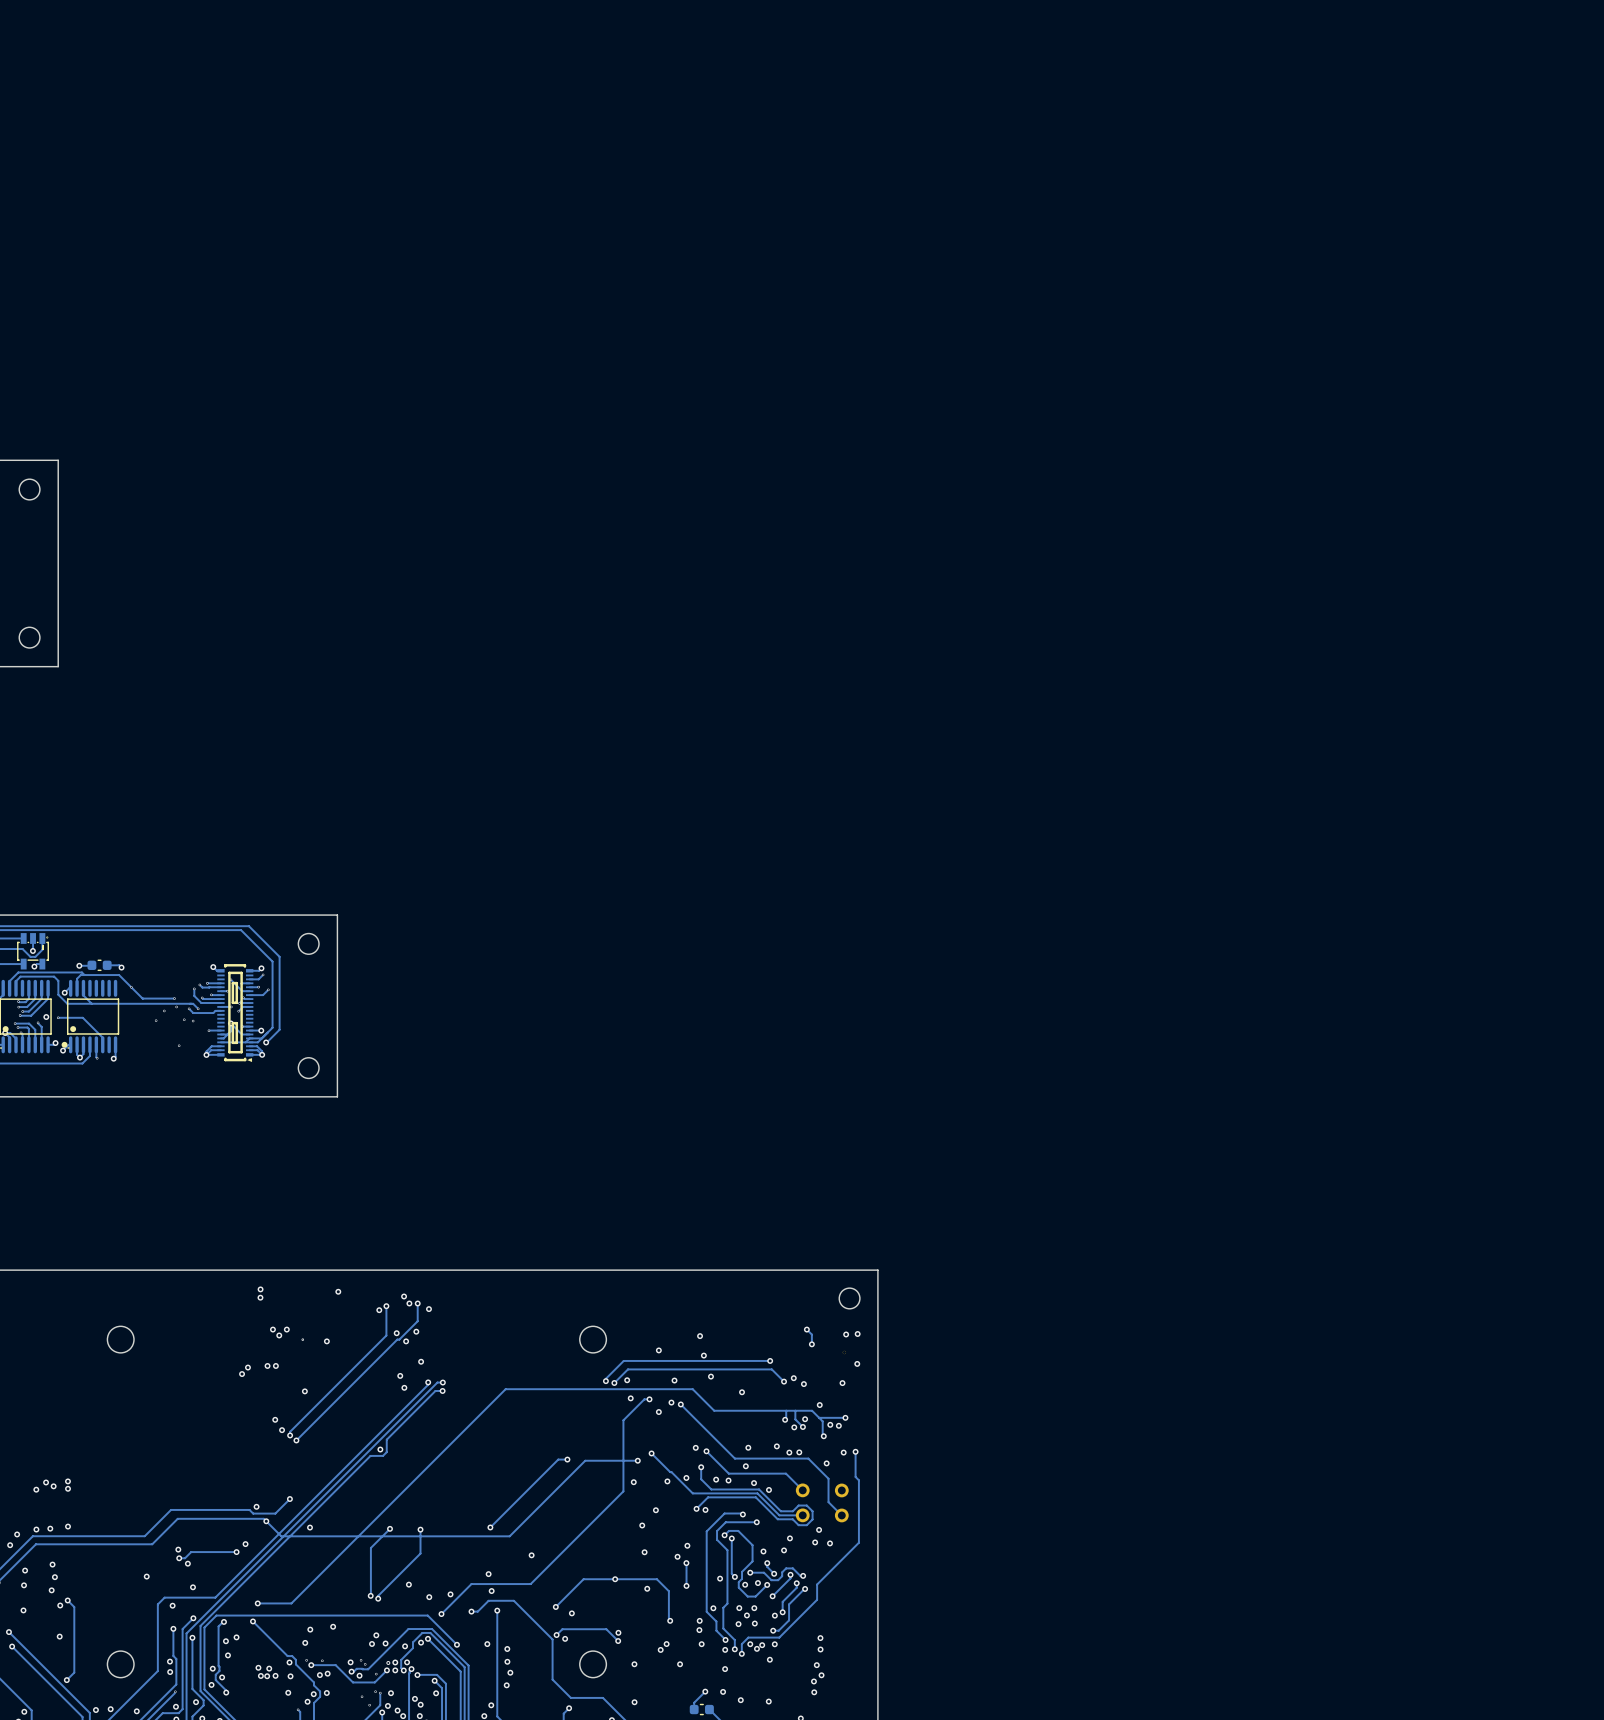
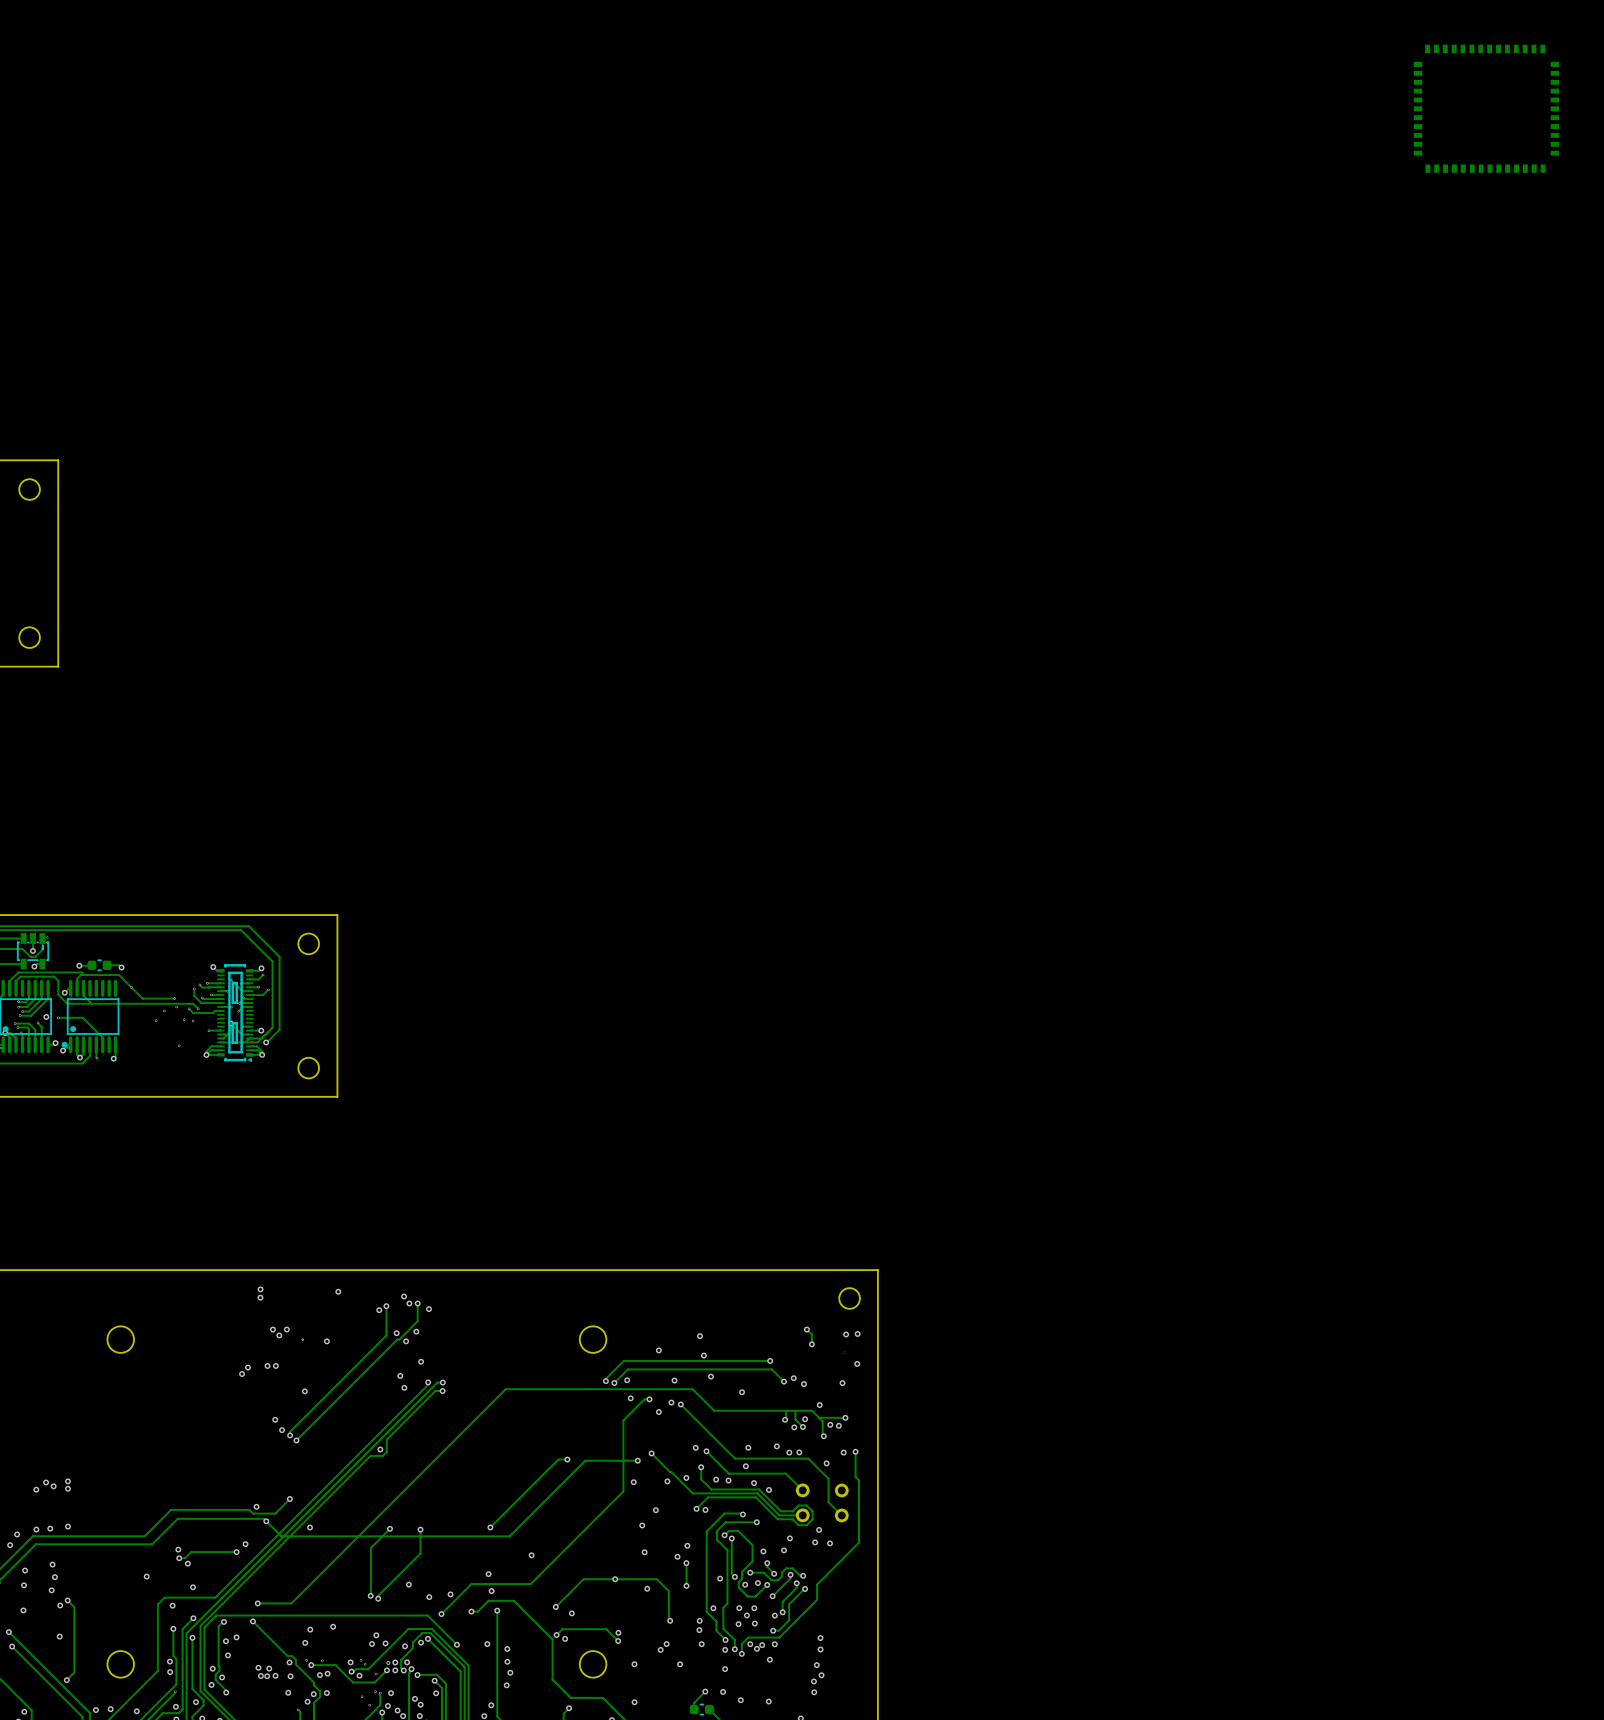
part: none -> (1486, 108)

